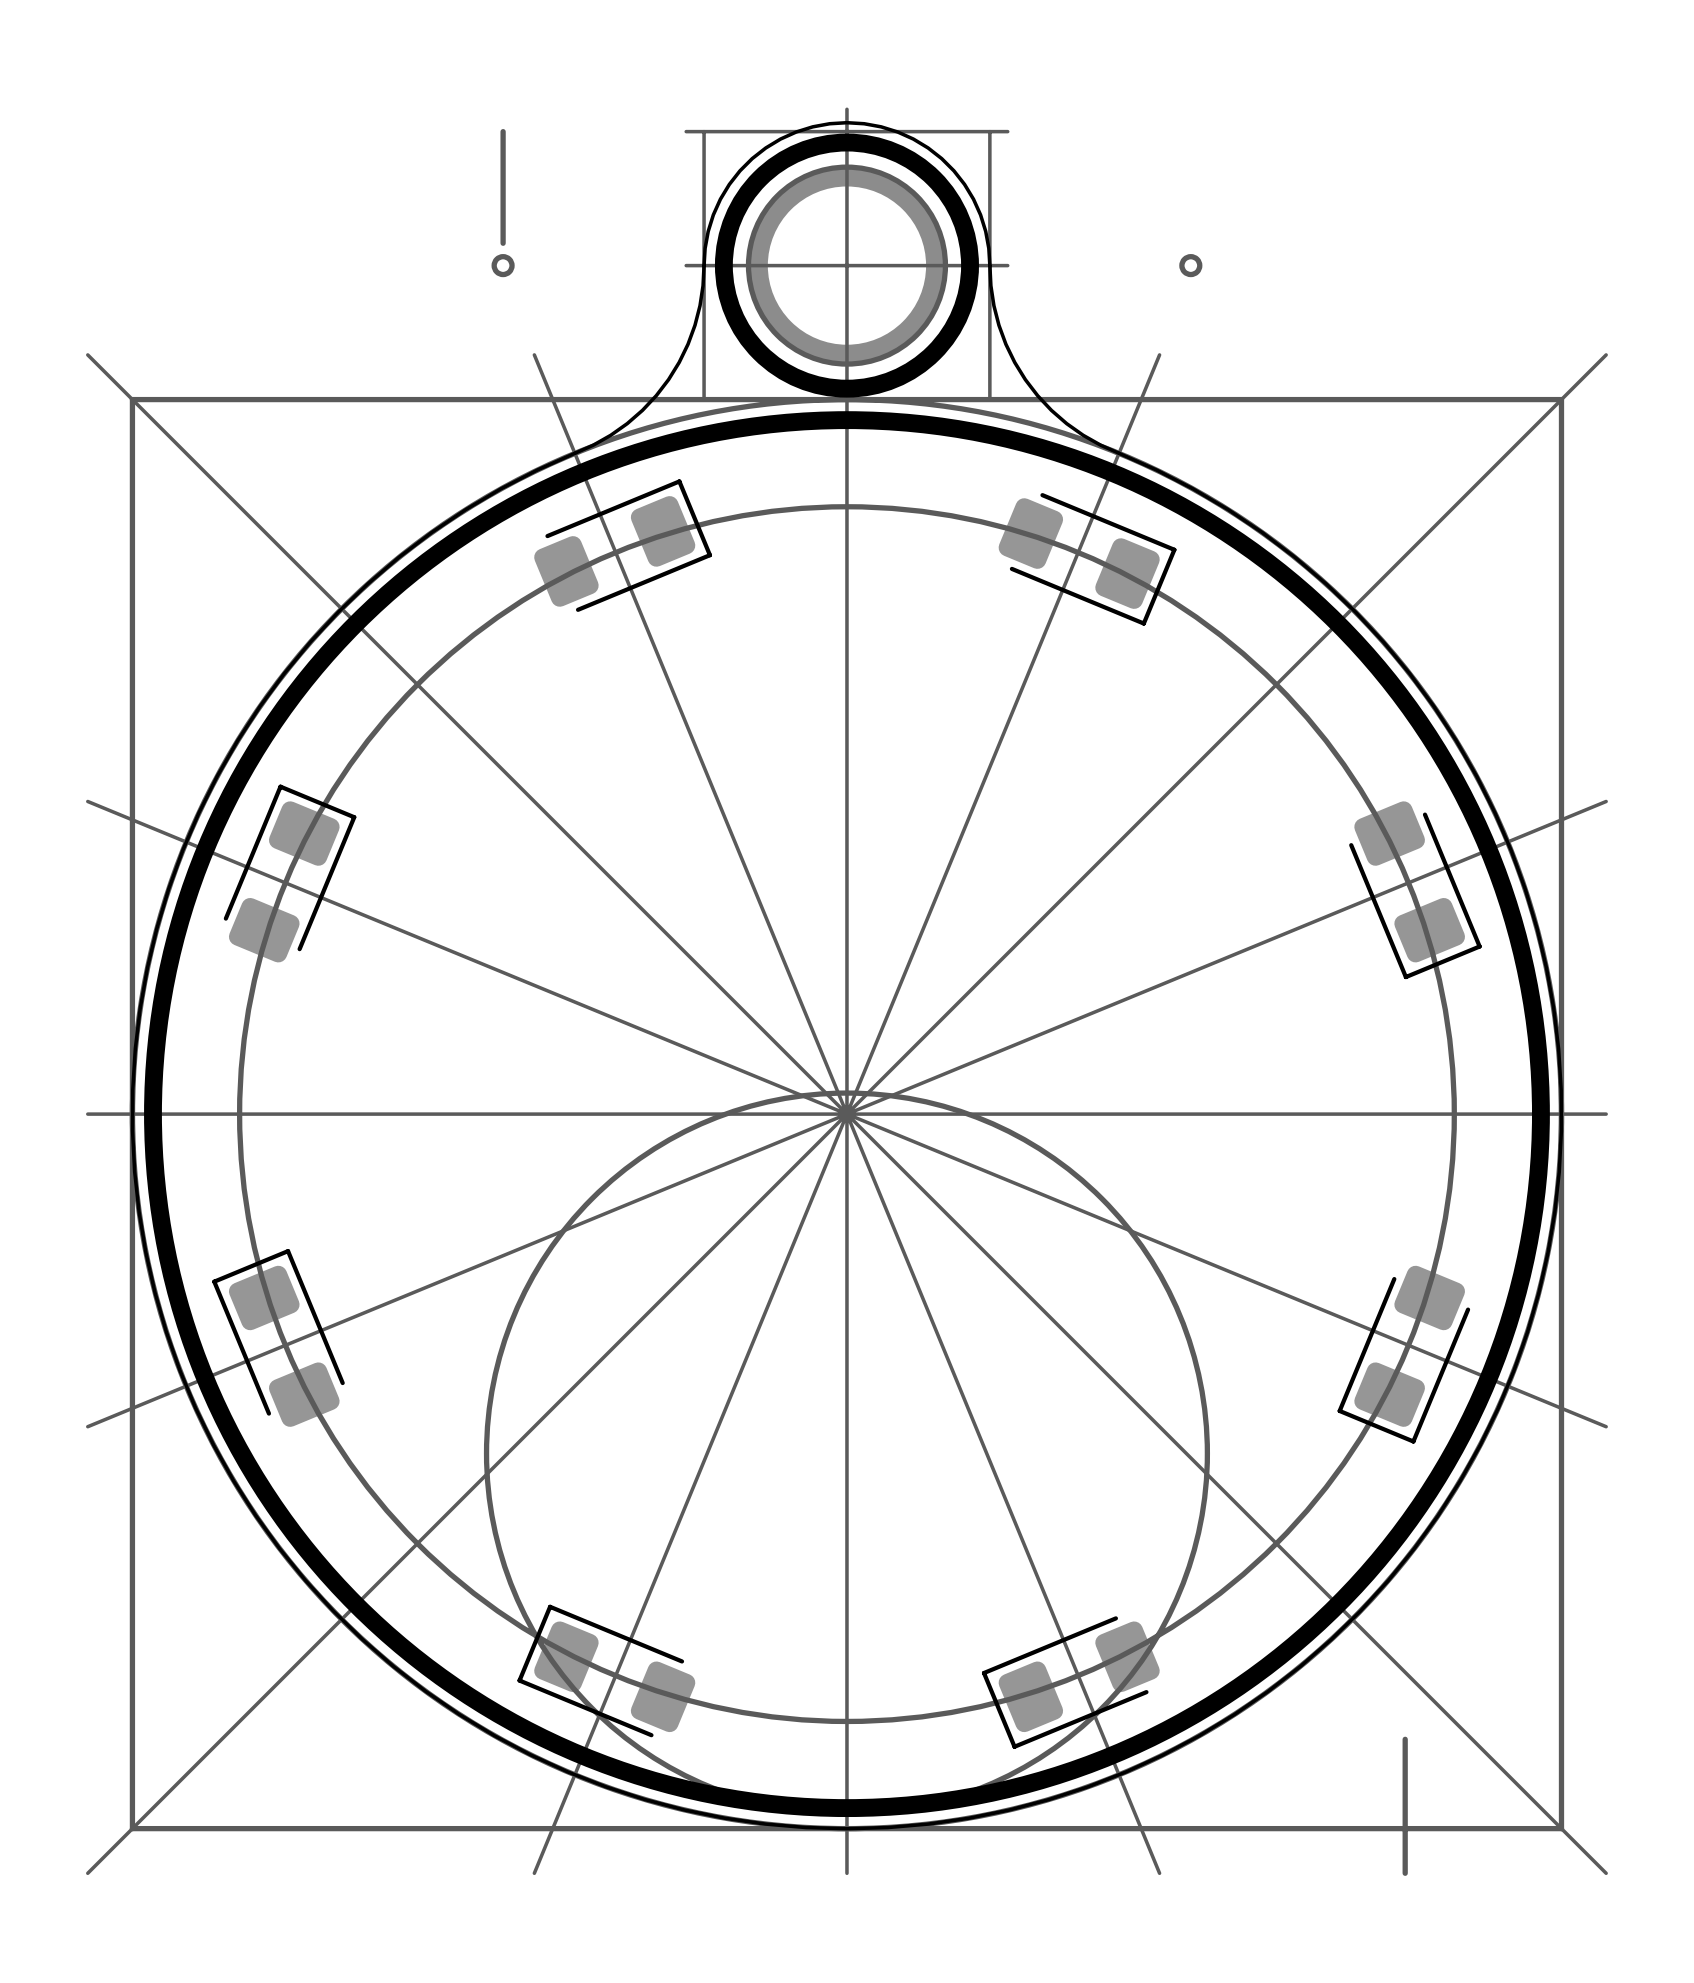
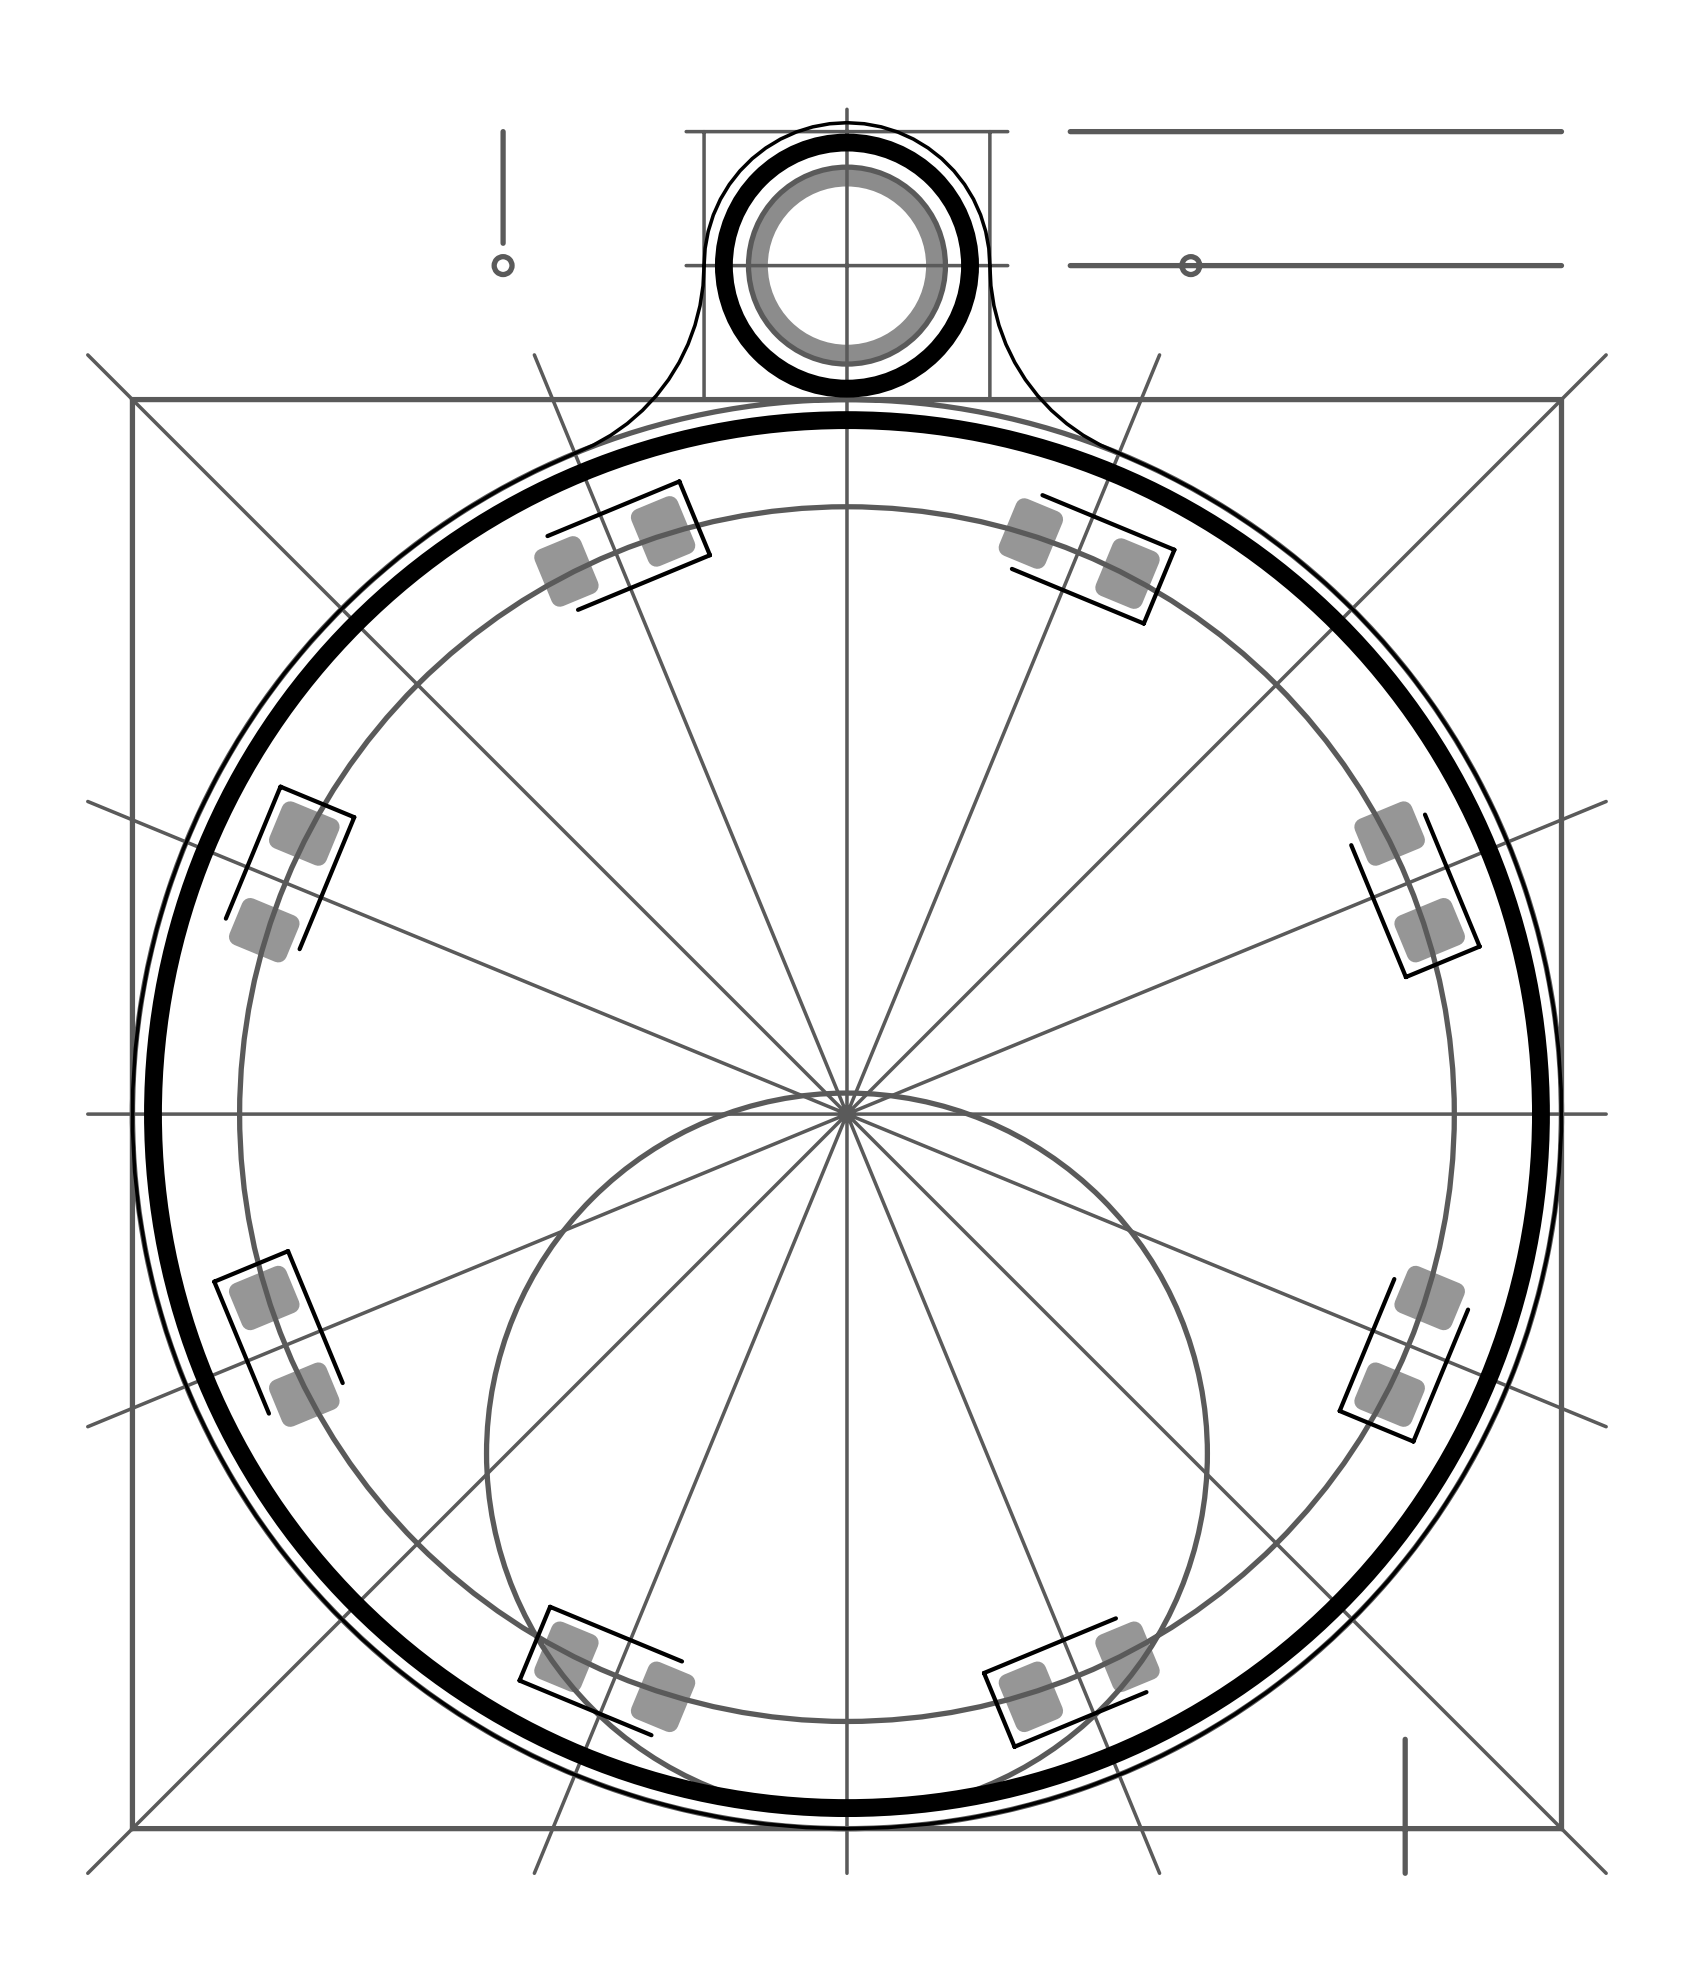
line: none -> (1070, 131) (1561, 131)
line: none -> (1070, 265) (1561, 265)

